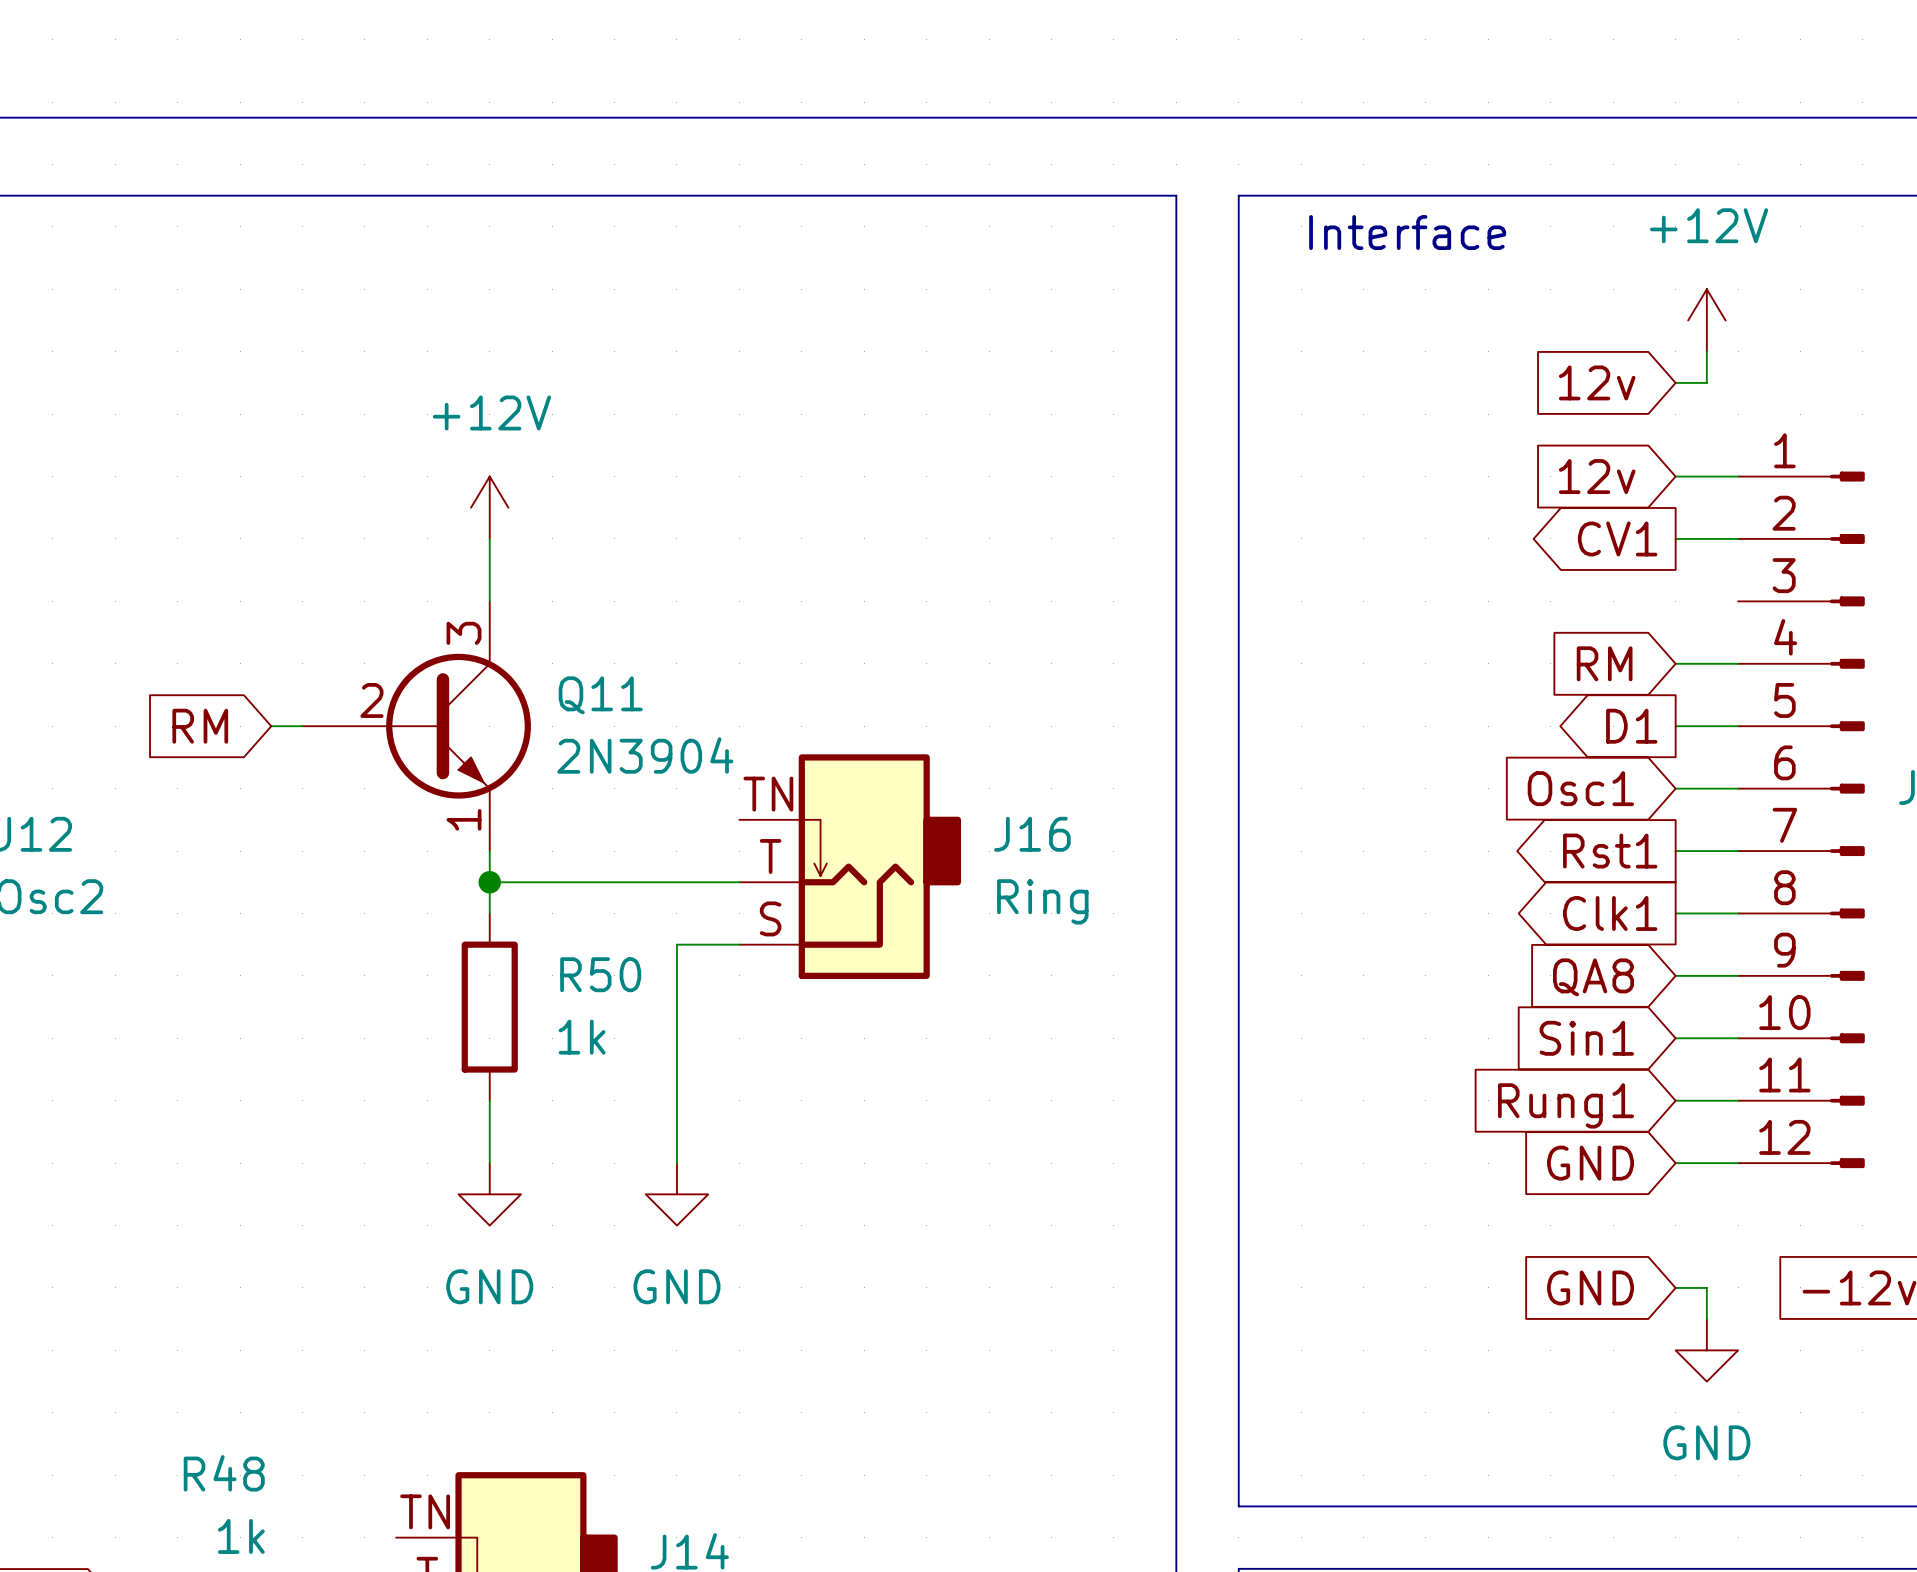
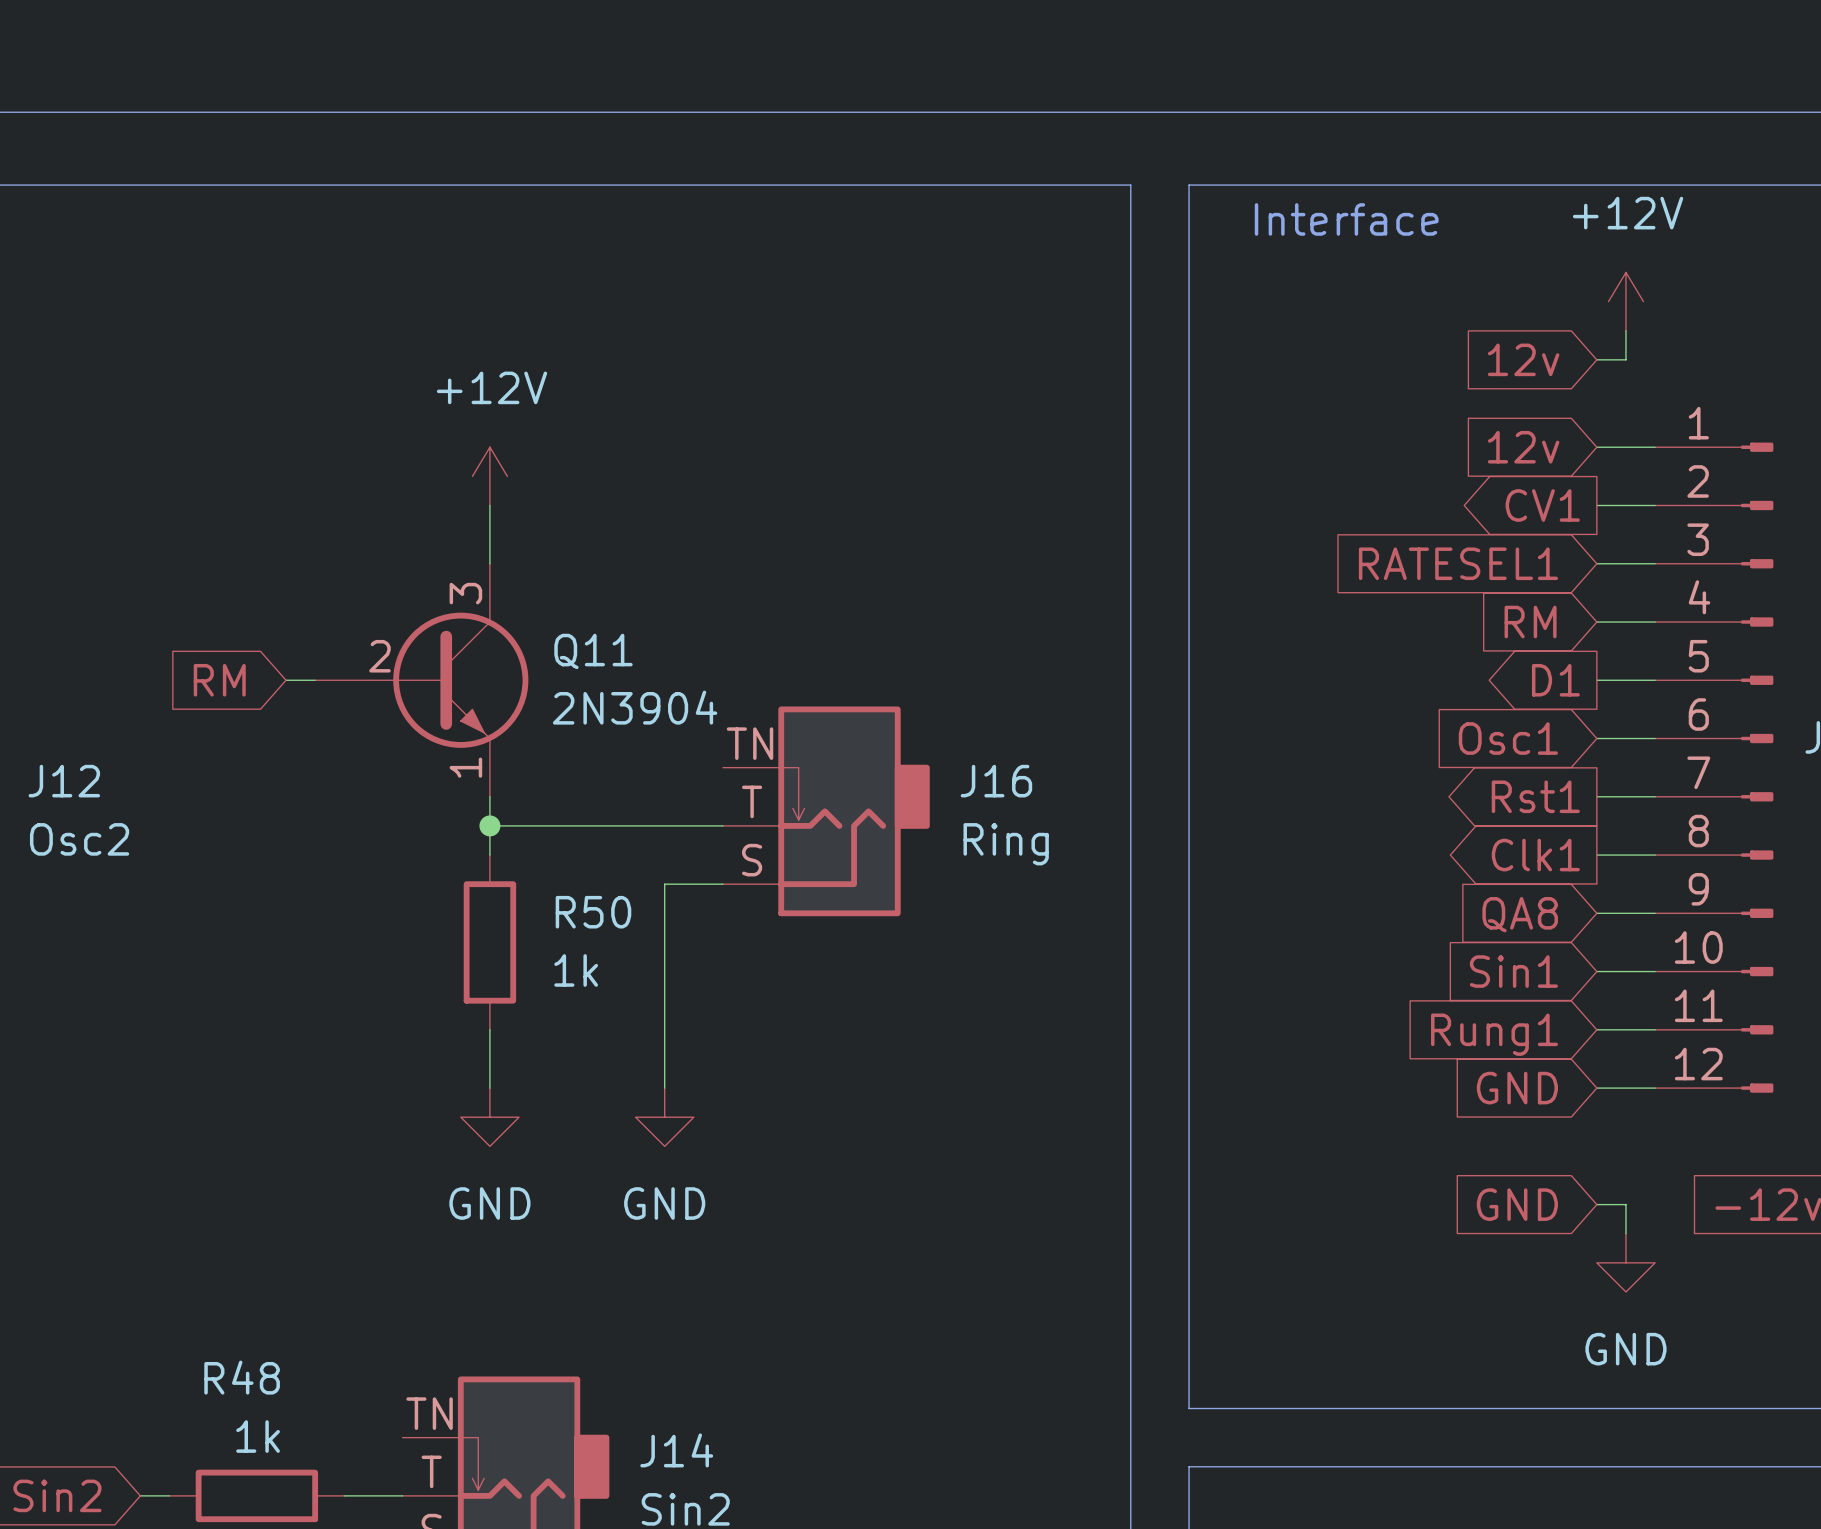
global label: none -> RATESEL1 (1458, 563)
wire: none -> (1596, 563) (1655, 563)

